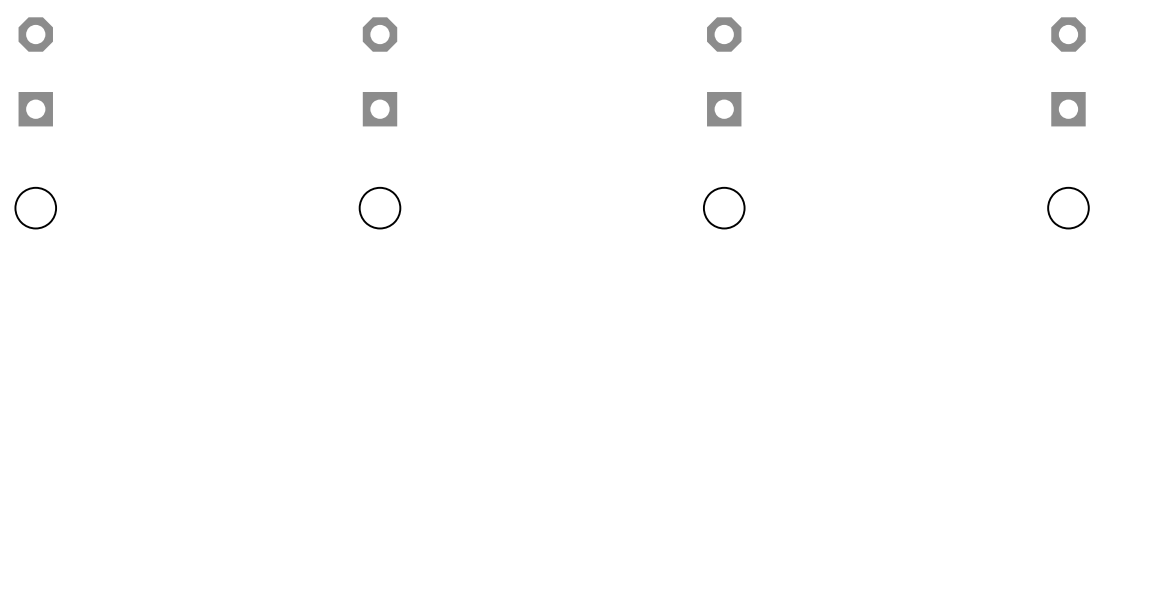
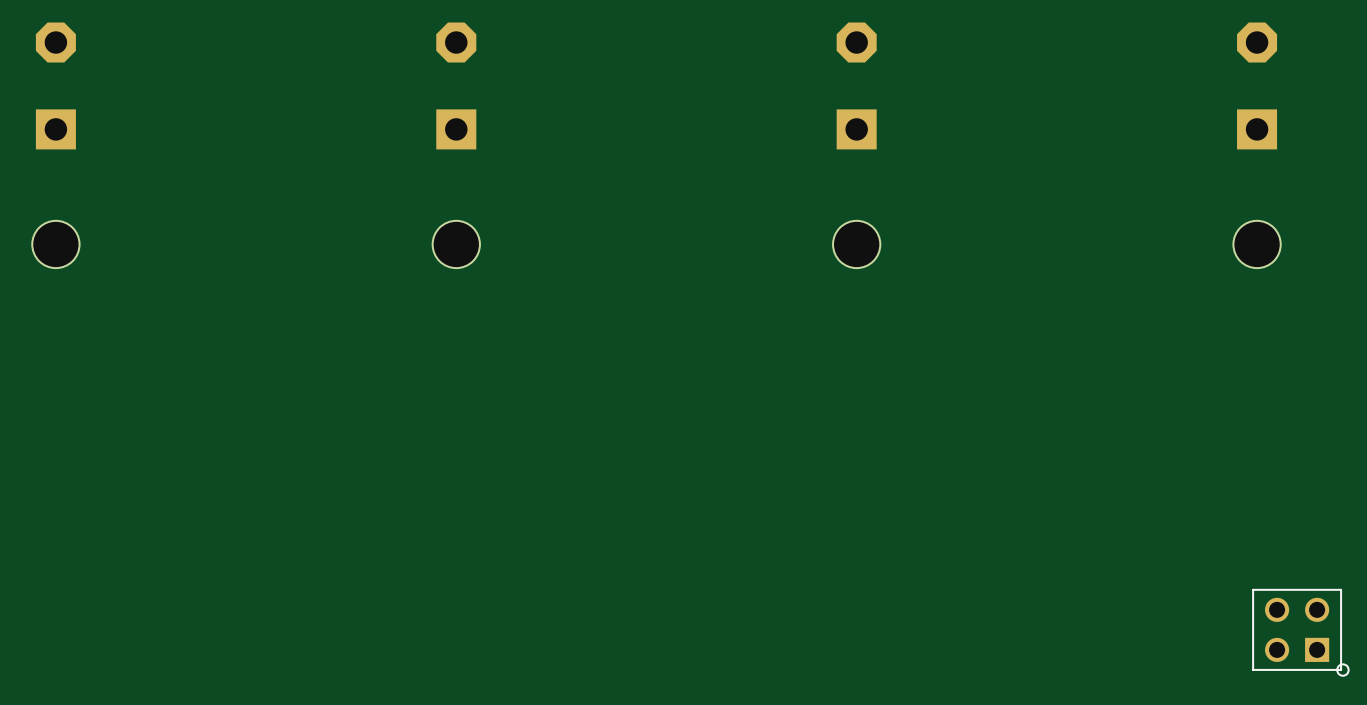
part: none -> (1300, 632)

